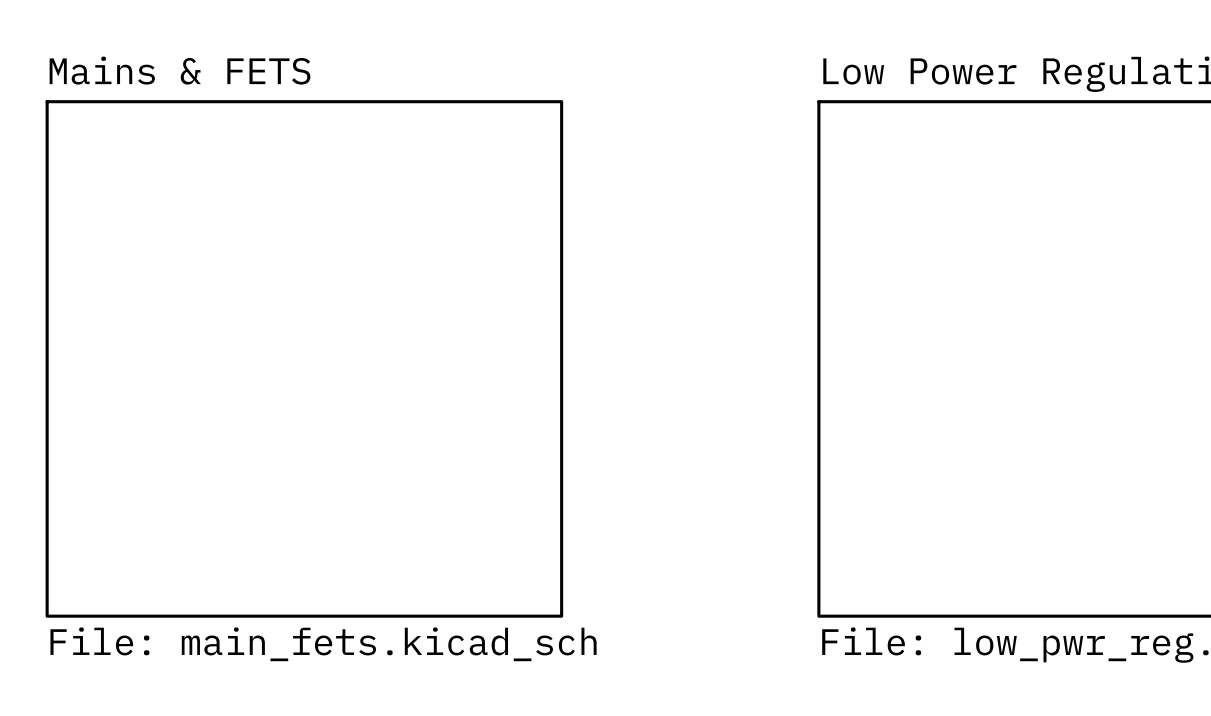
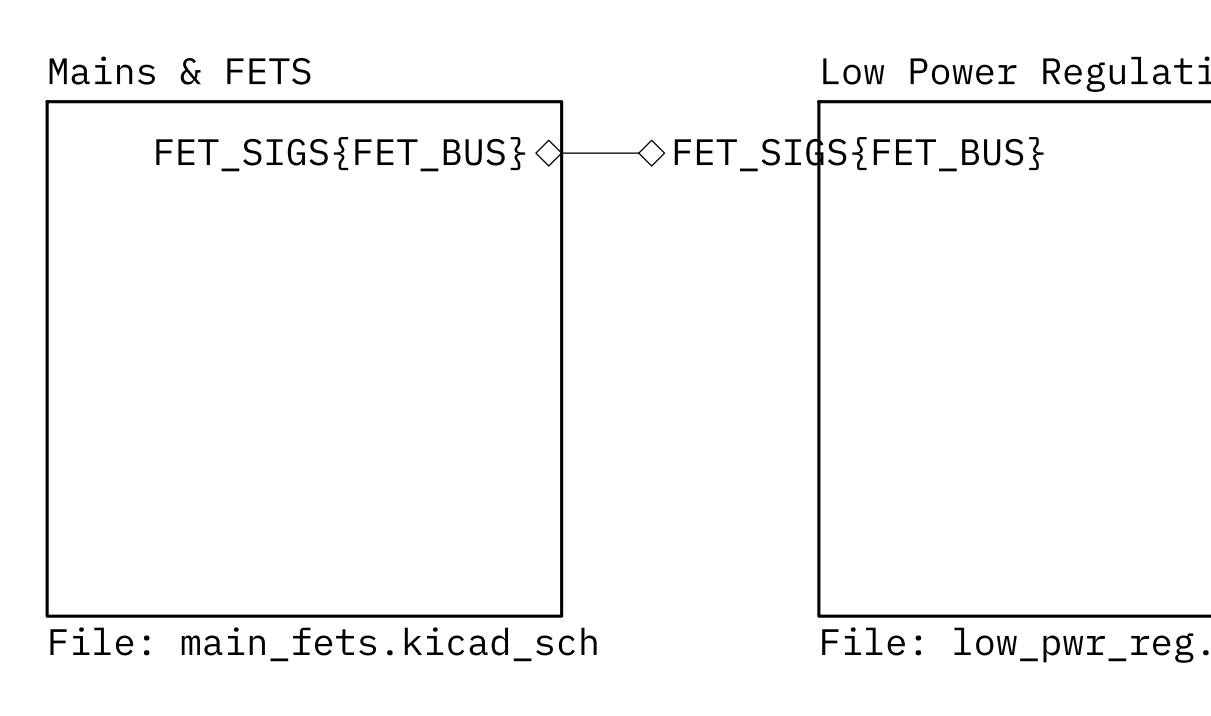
bus: none -> (561, 153) (638, 153)
sheet pin: none -> FET_SIGS{FET_BUS} (340, 154)
hierarchical label: none -> FET_SIGS{FET_BUS} (859, 154)

